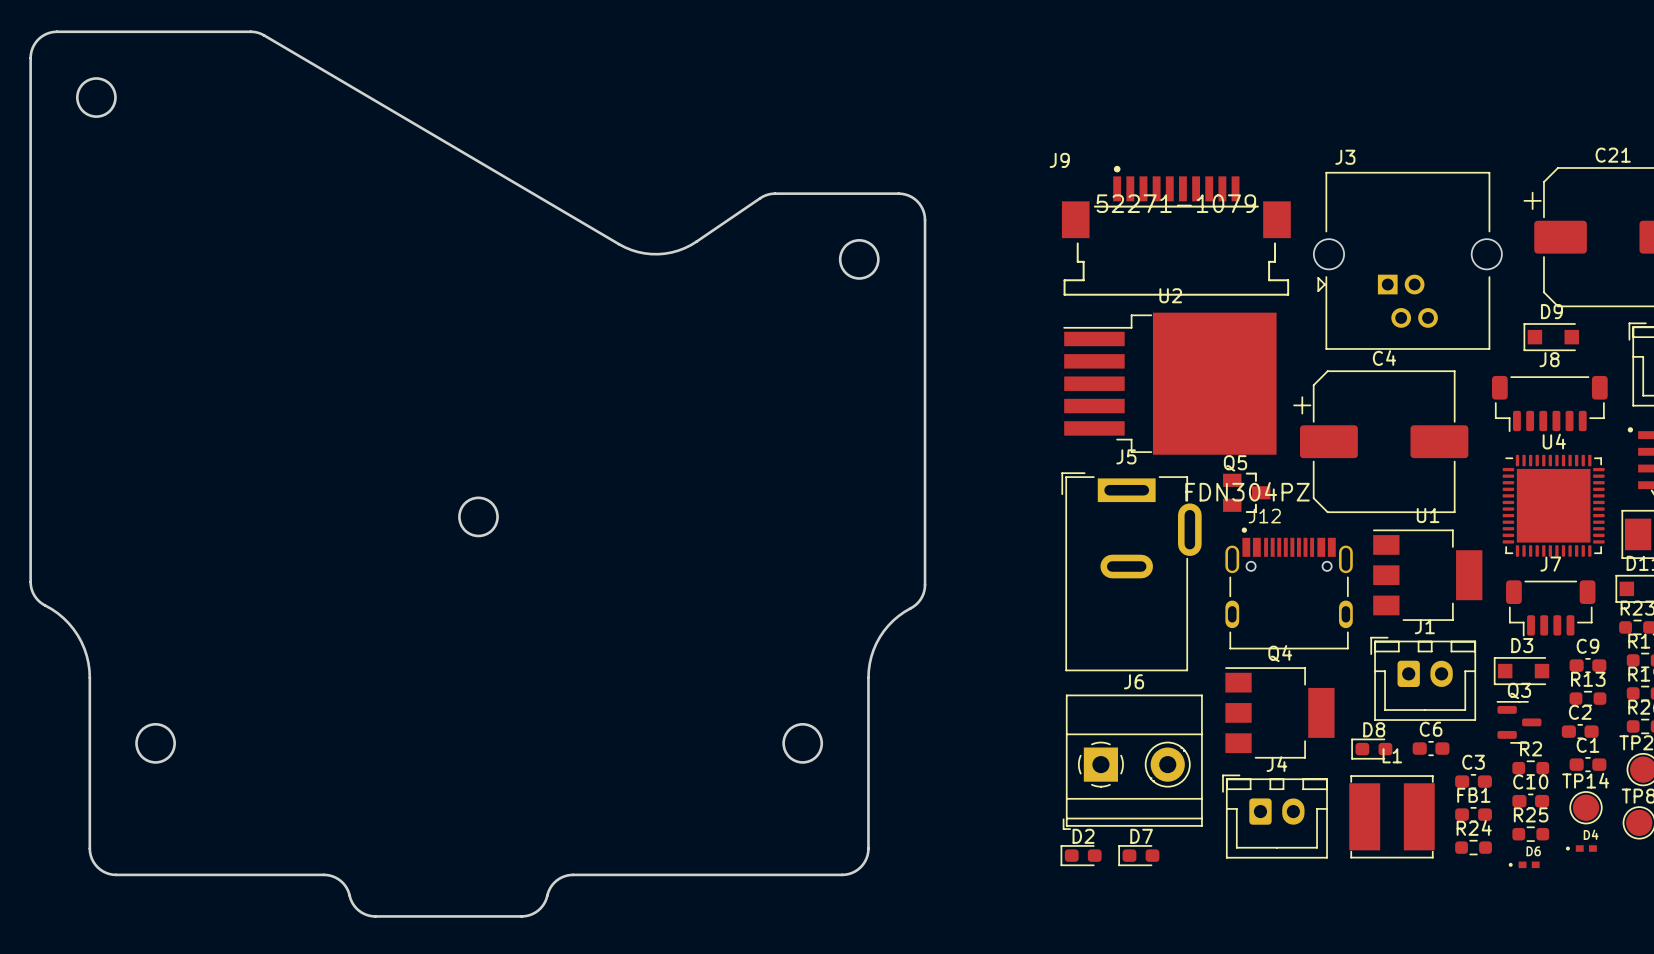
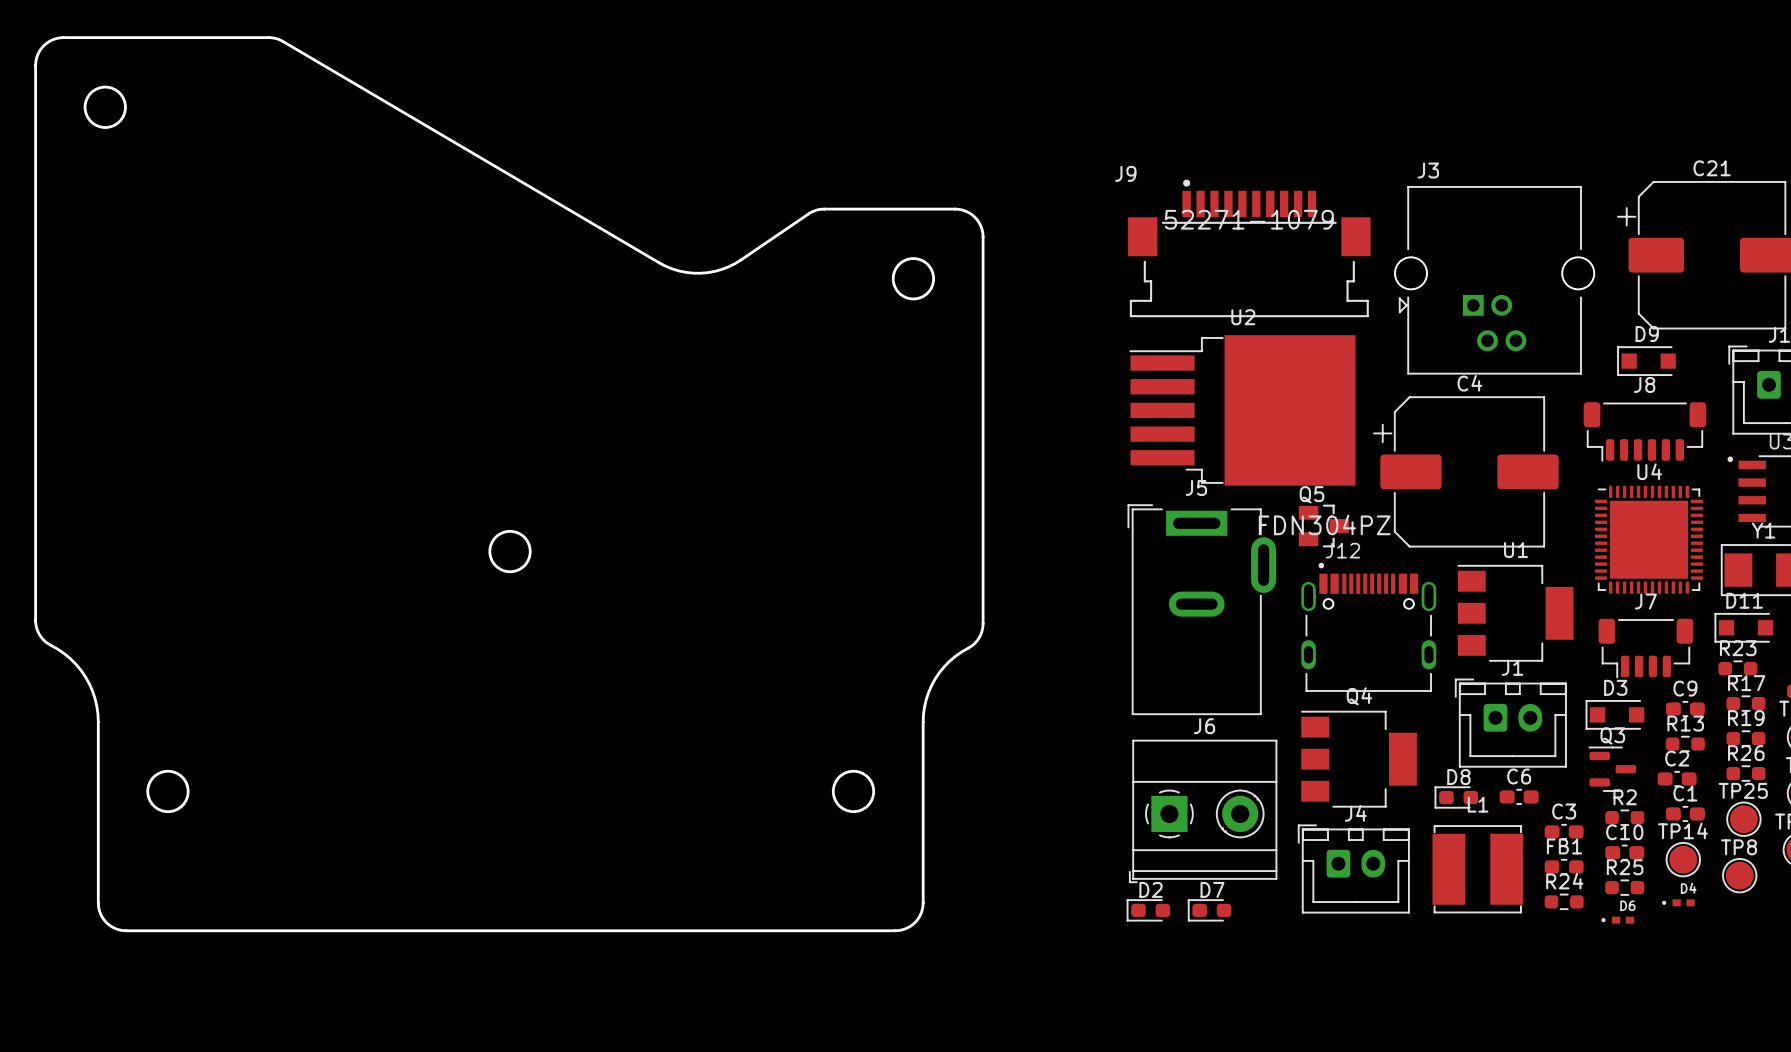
board edge: (323, 874) (332, 876) (340, 880) (346, 887) (356, 908) (366, 914) (375, 916) (527, 915) (535, 912) (542, 906) (550, 887) (556, 880) (564, 876) (573, 874) -> (346, 930) (610, 930)

